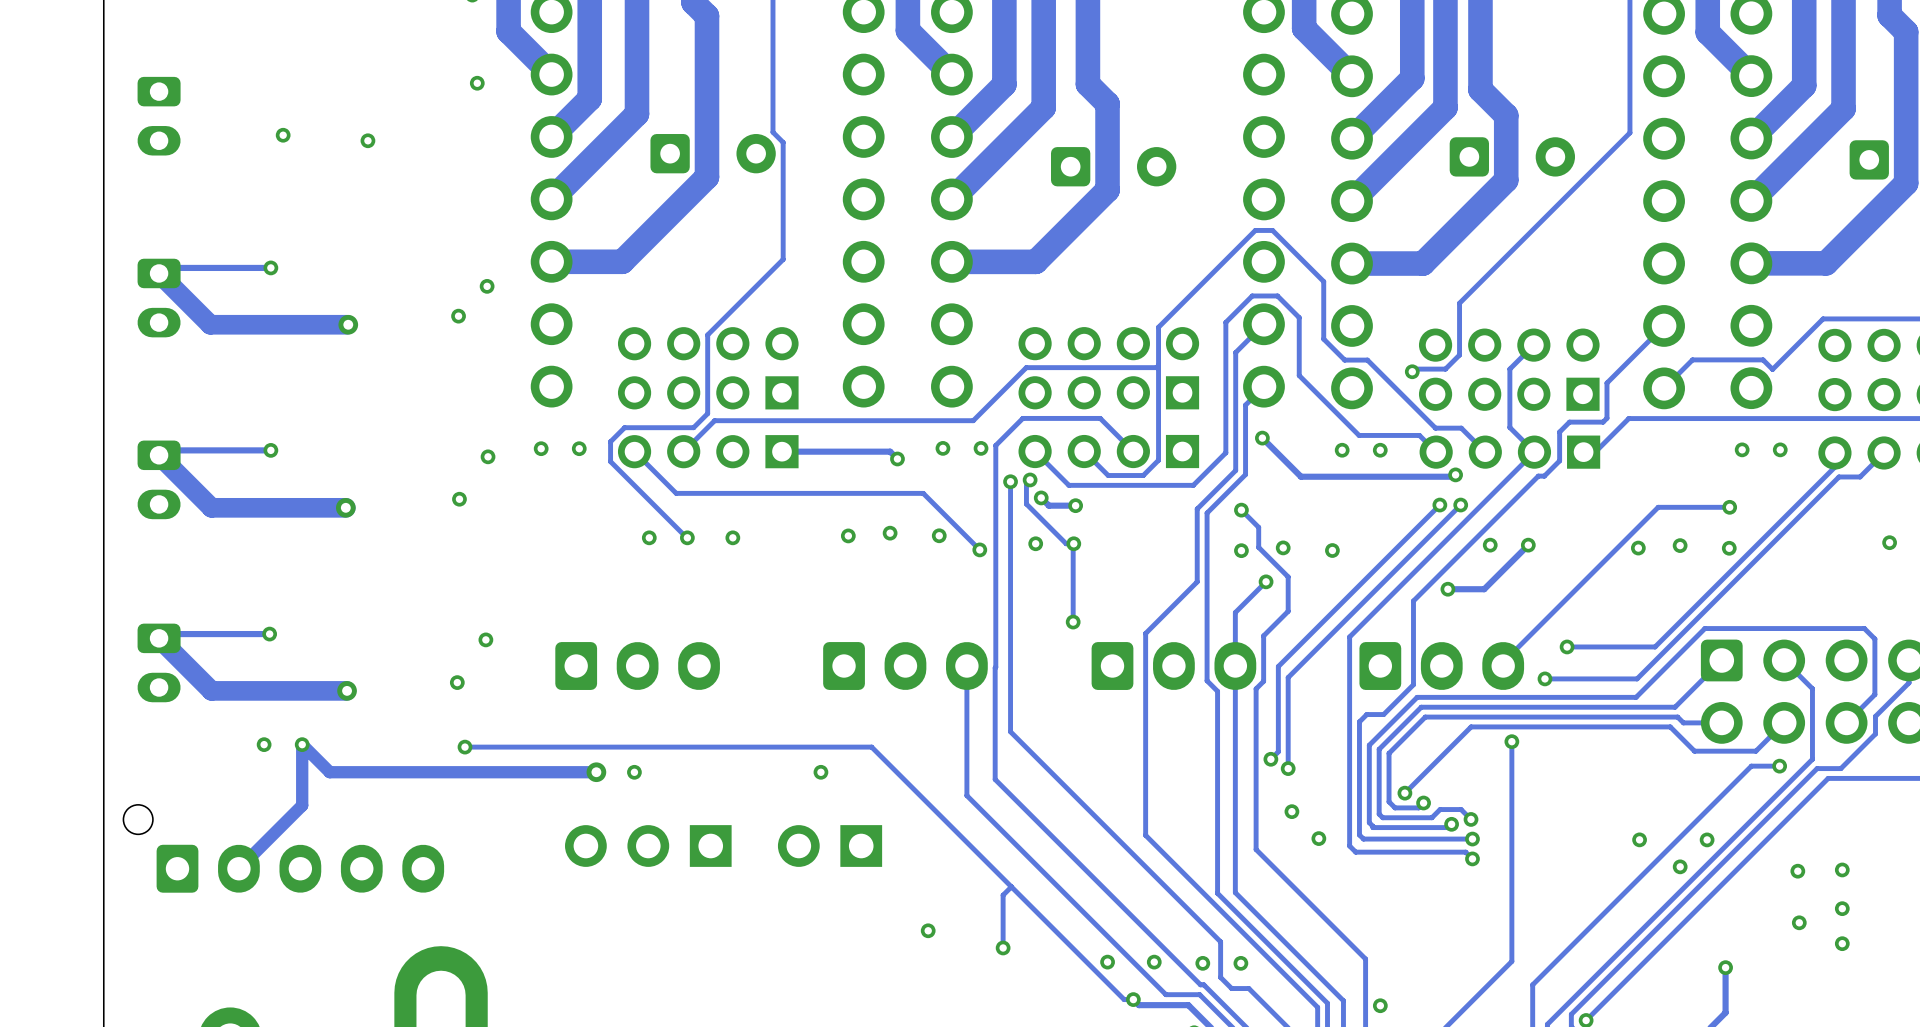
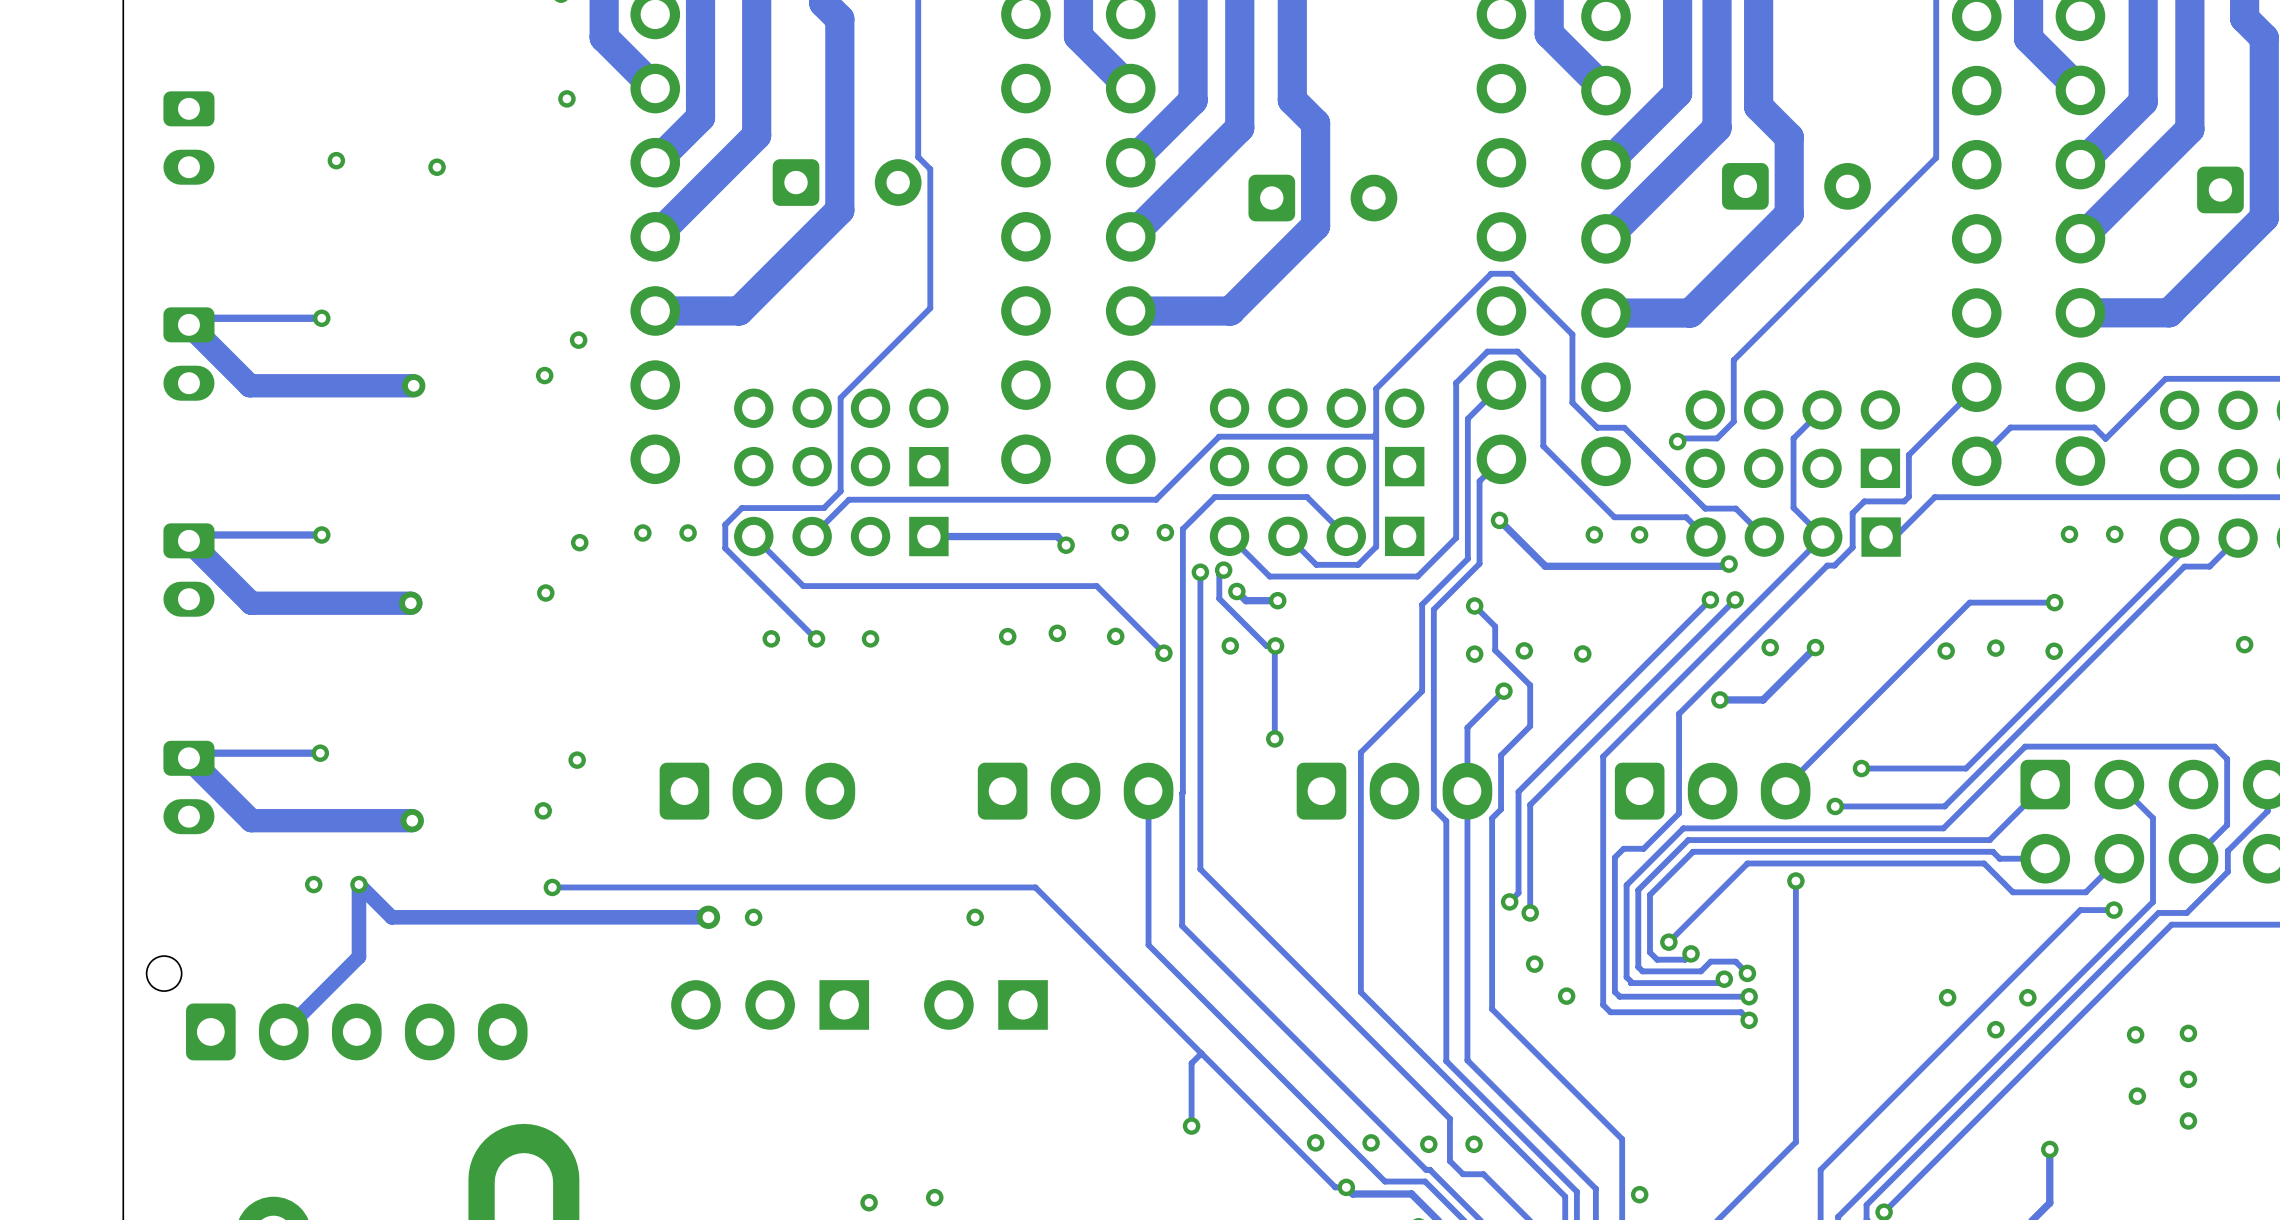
via: (928, 930) -> none
via: none -> (934, 1197)
via: none -> (869, 1202)

